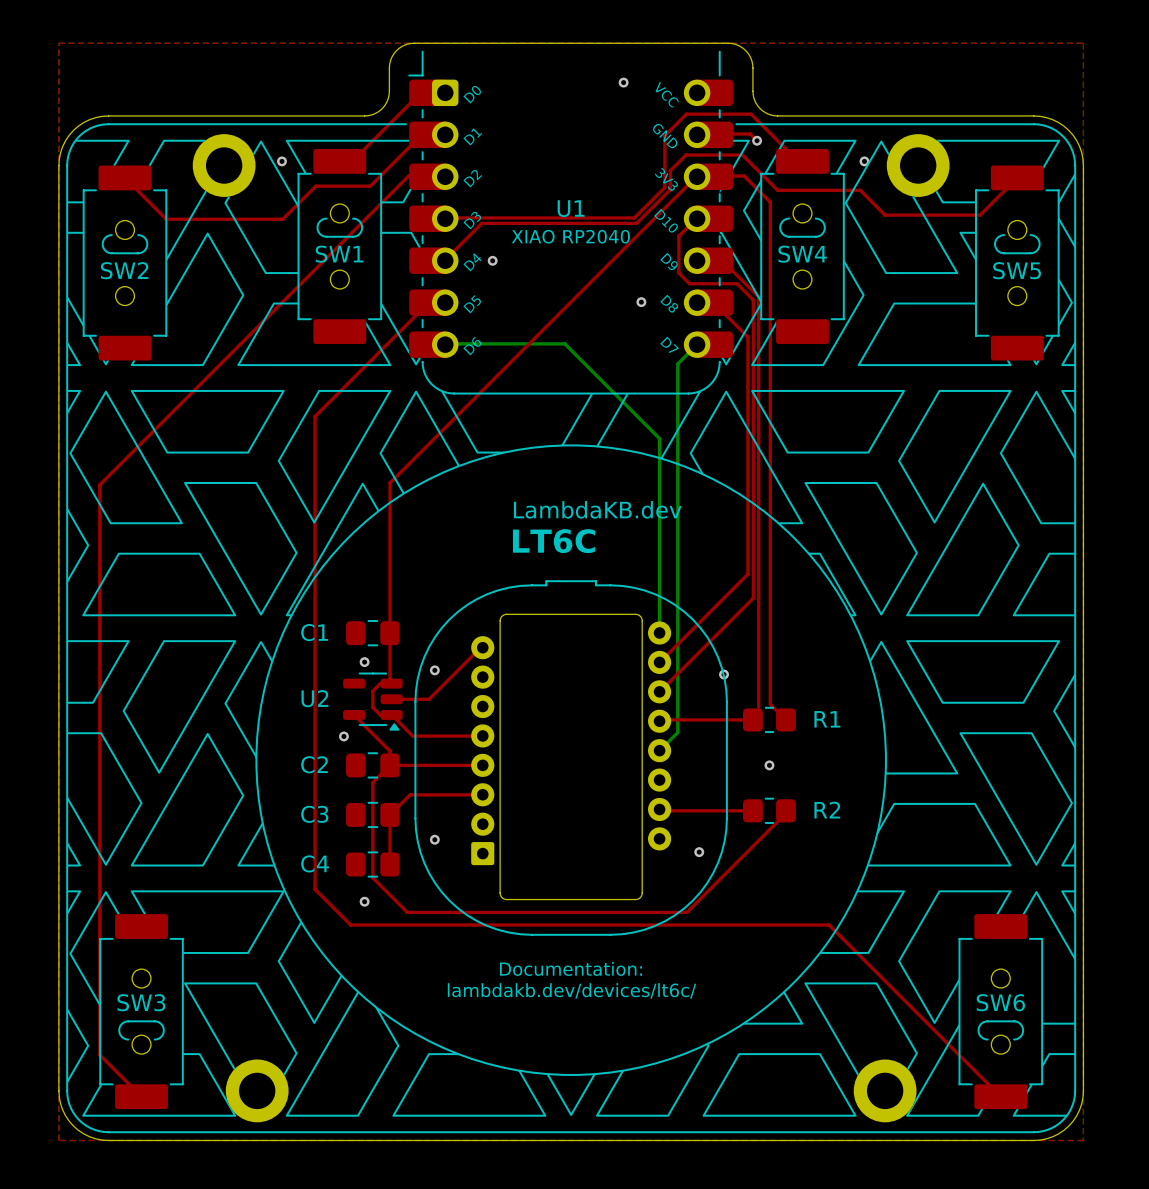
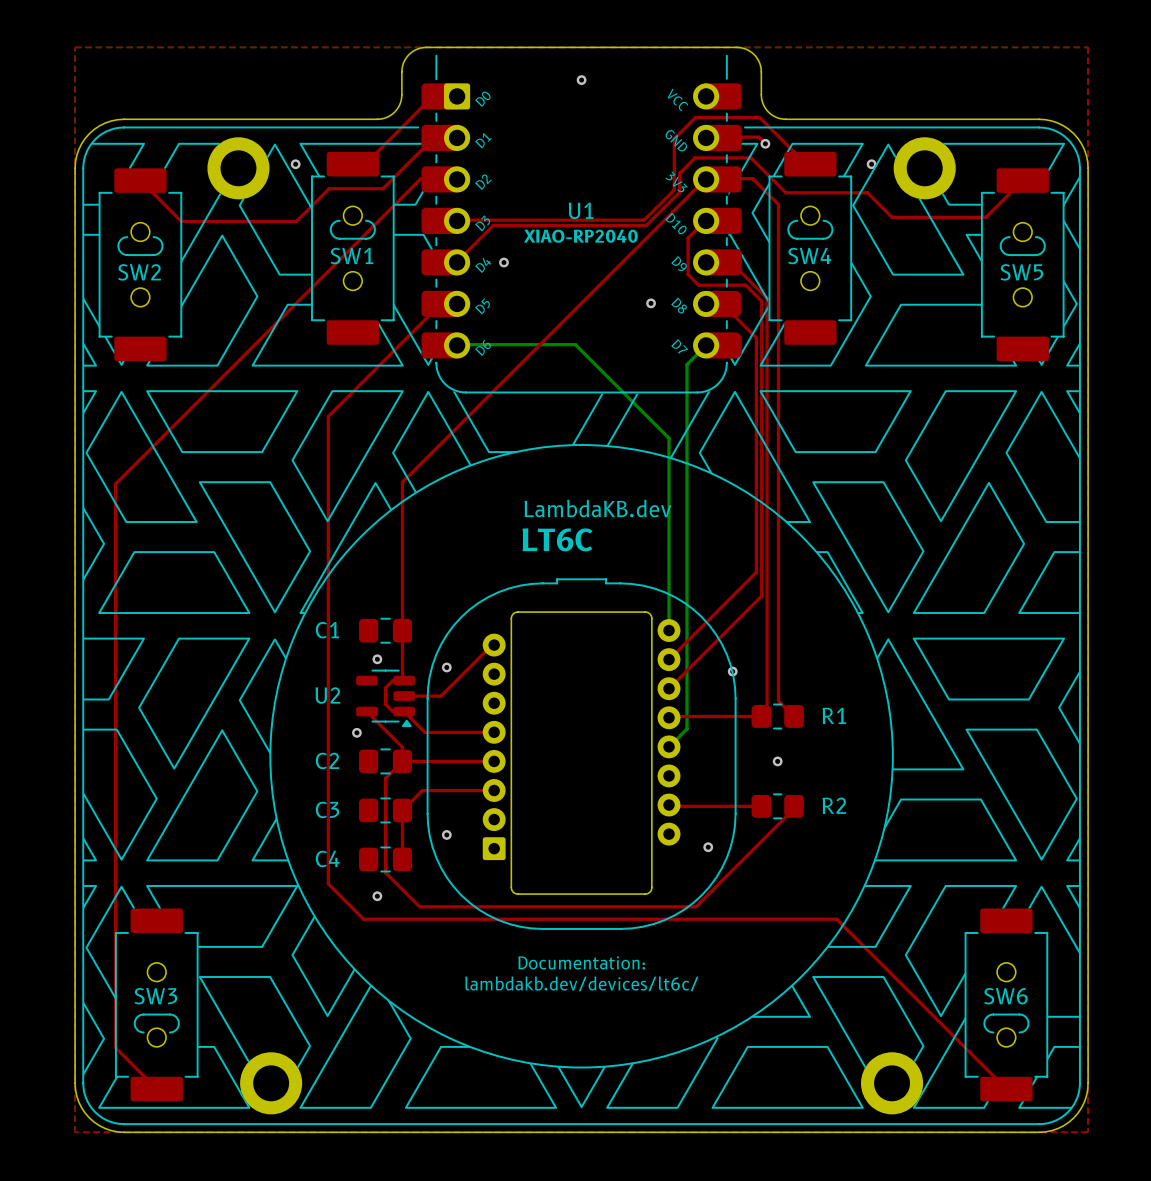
U1 footprint: [408, 50, 734, 395] -> [421, 54, 742, 394]
via position: (623, 82) -> (581, 80)
U1 value: none -> XIAO-RP2040 (580, 236)
text: XIAO RP2040 (570, 236) -> none
drawing: [721, 250, 762, 366] -> none
drawing: none -> [730, 252, 768, 366]

